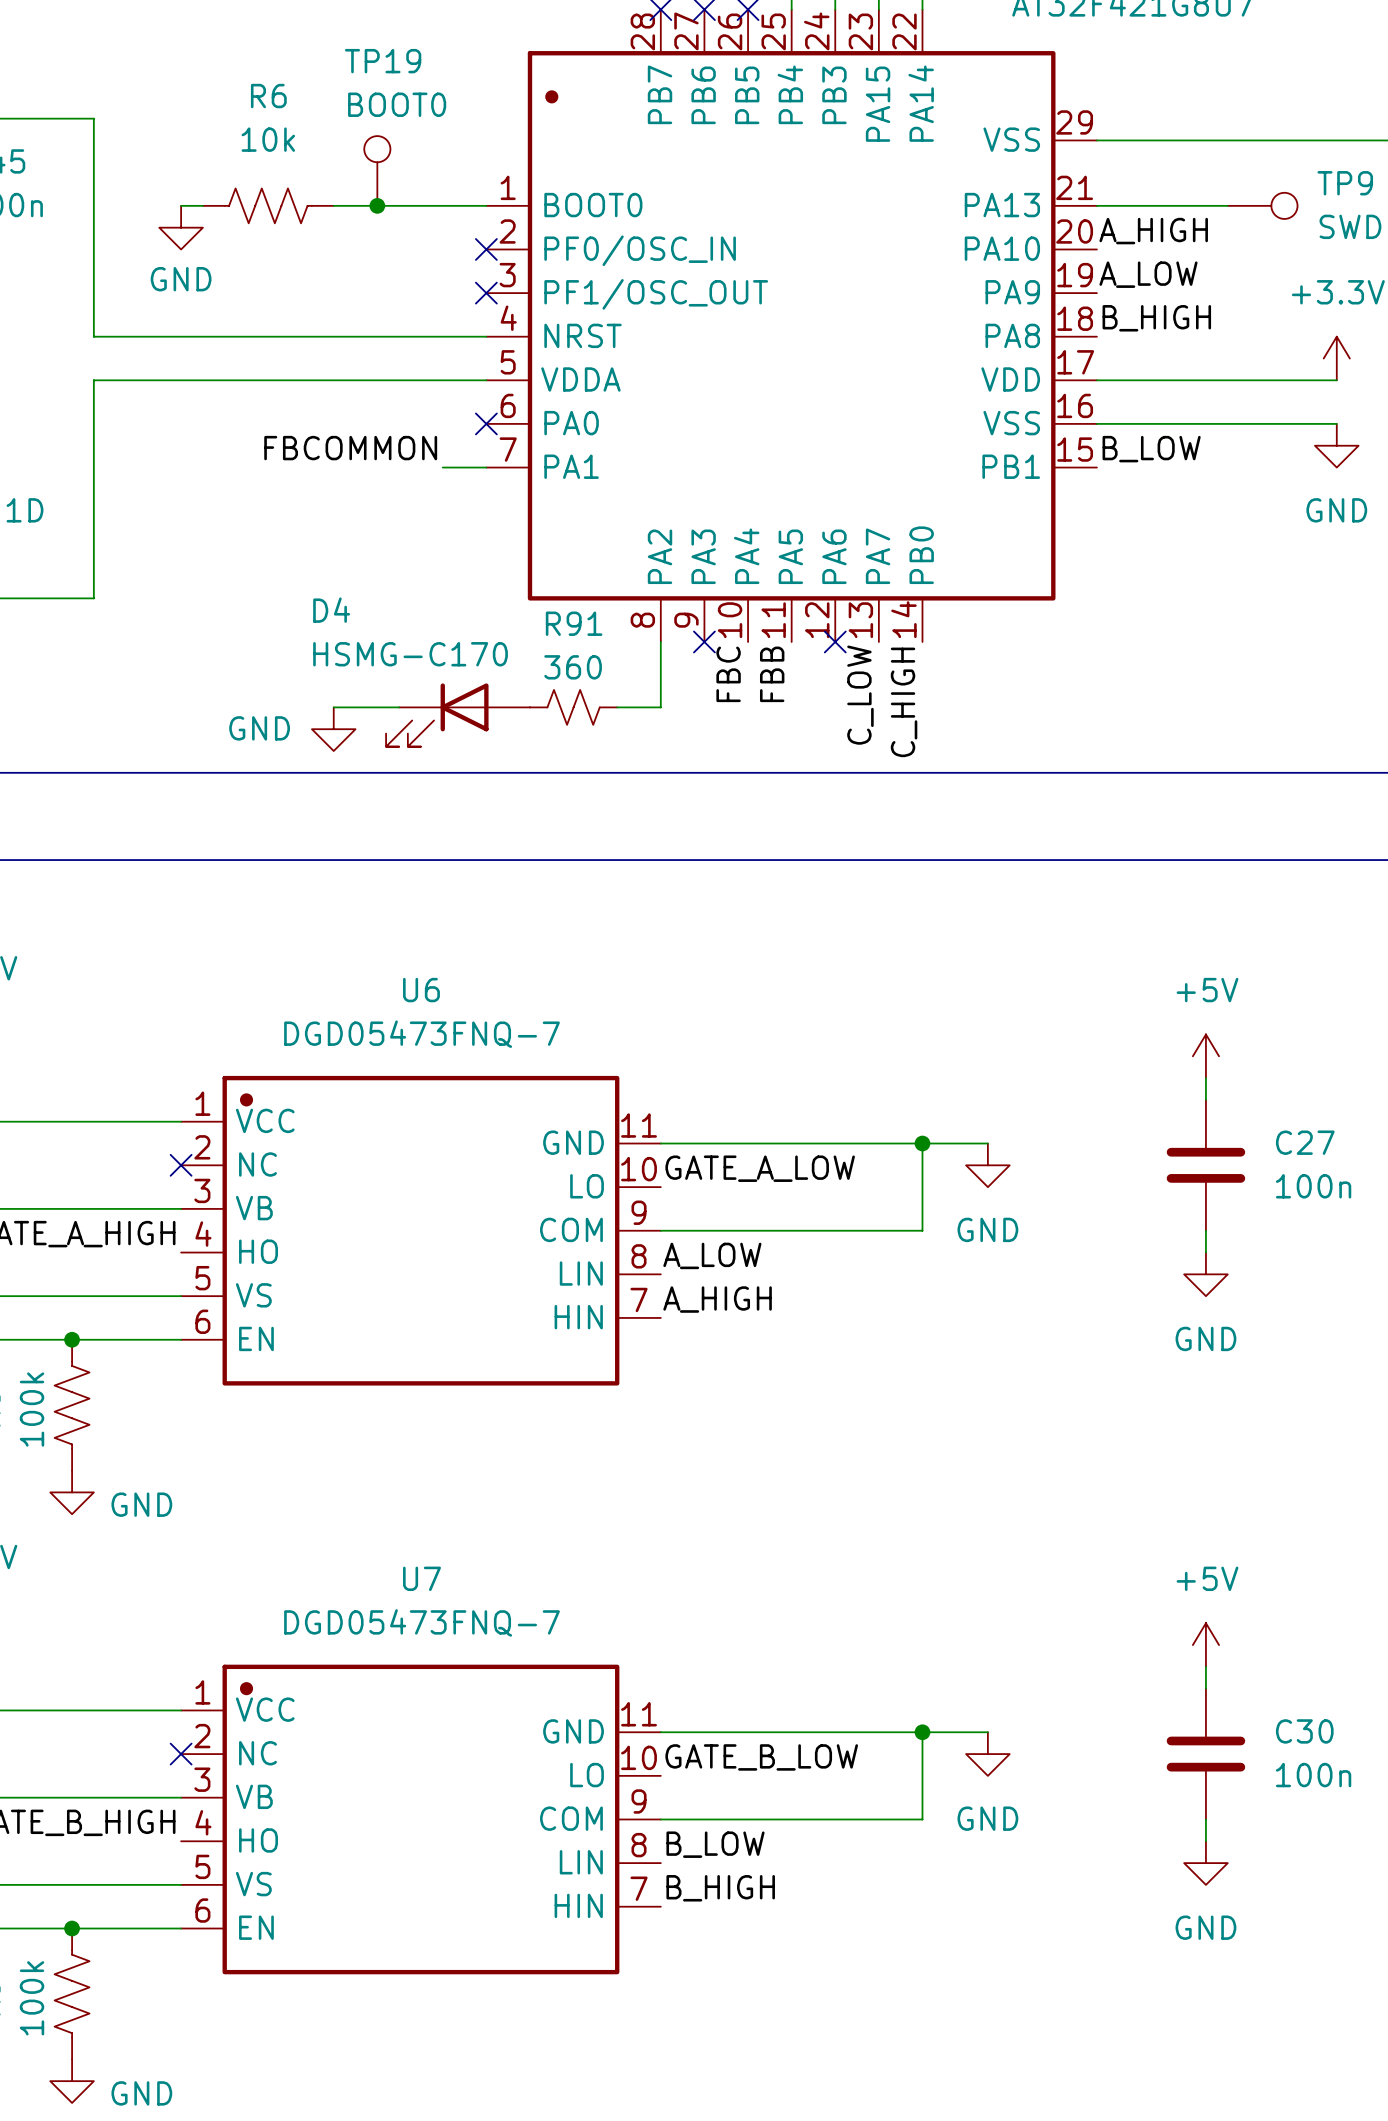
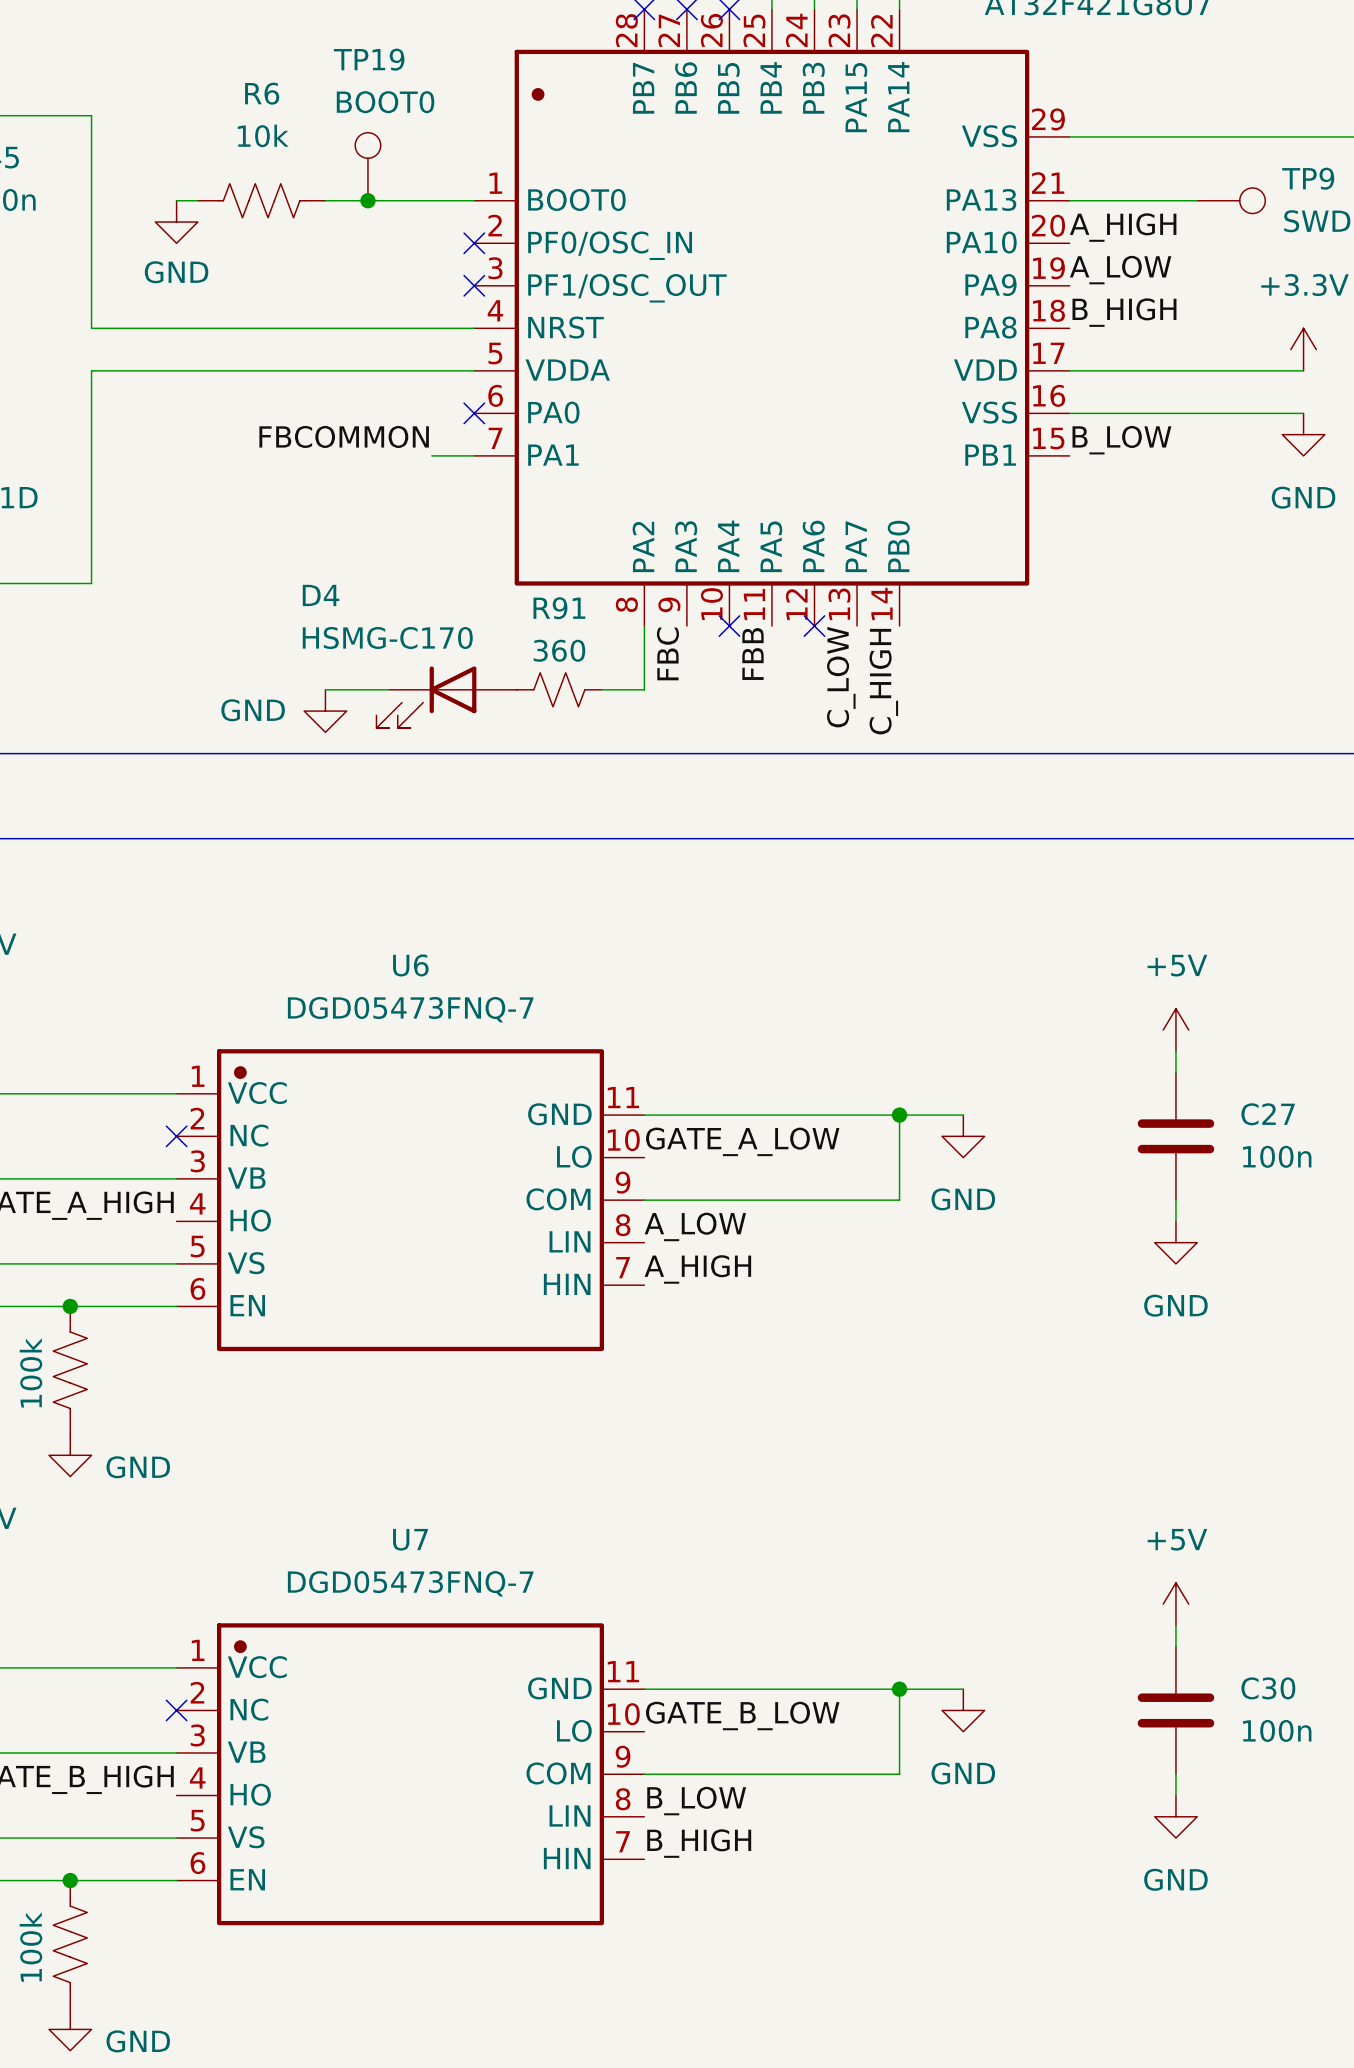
no-connect mark position: (704, 641) -> (729, 626)
label position: FBC (728, 674) -> FBC (667, 653)

